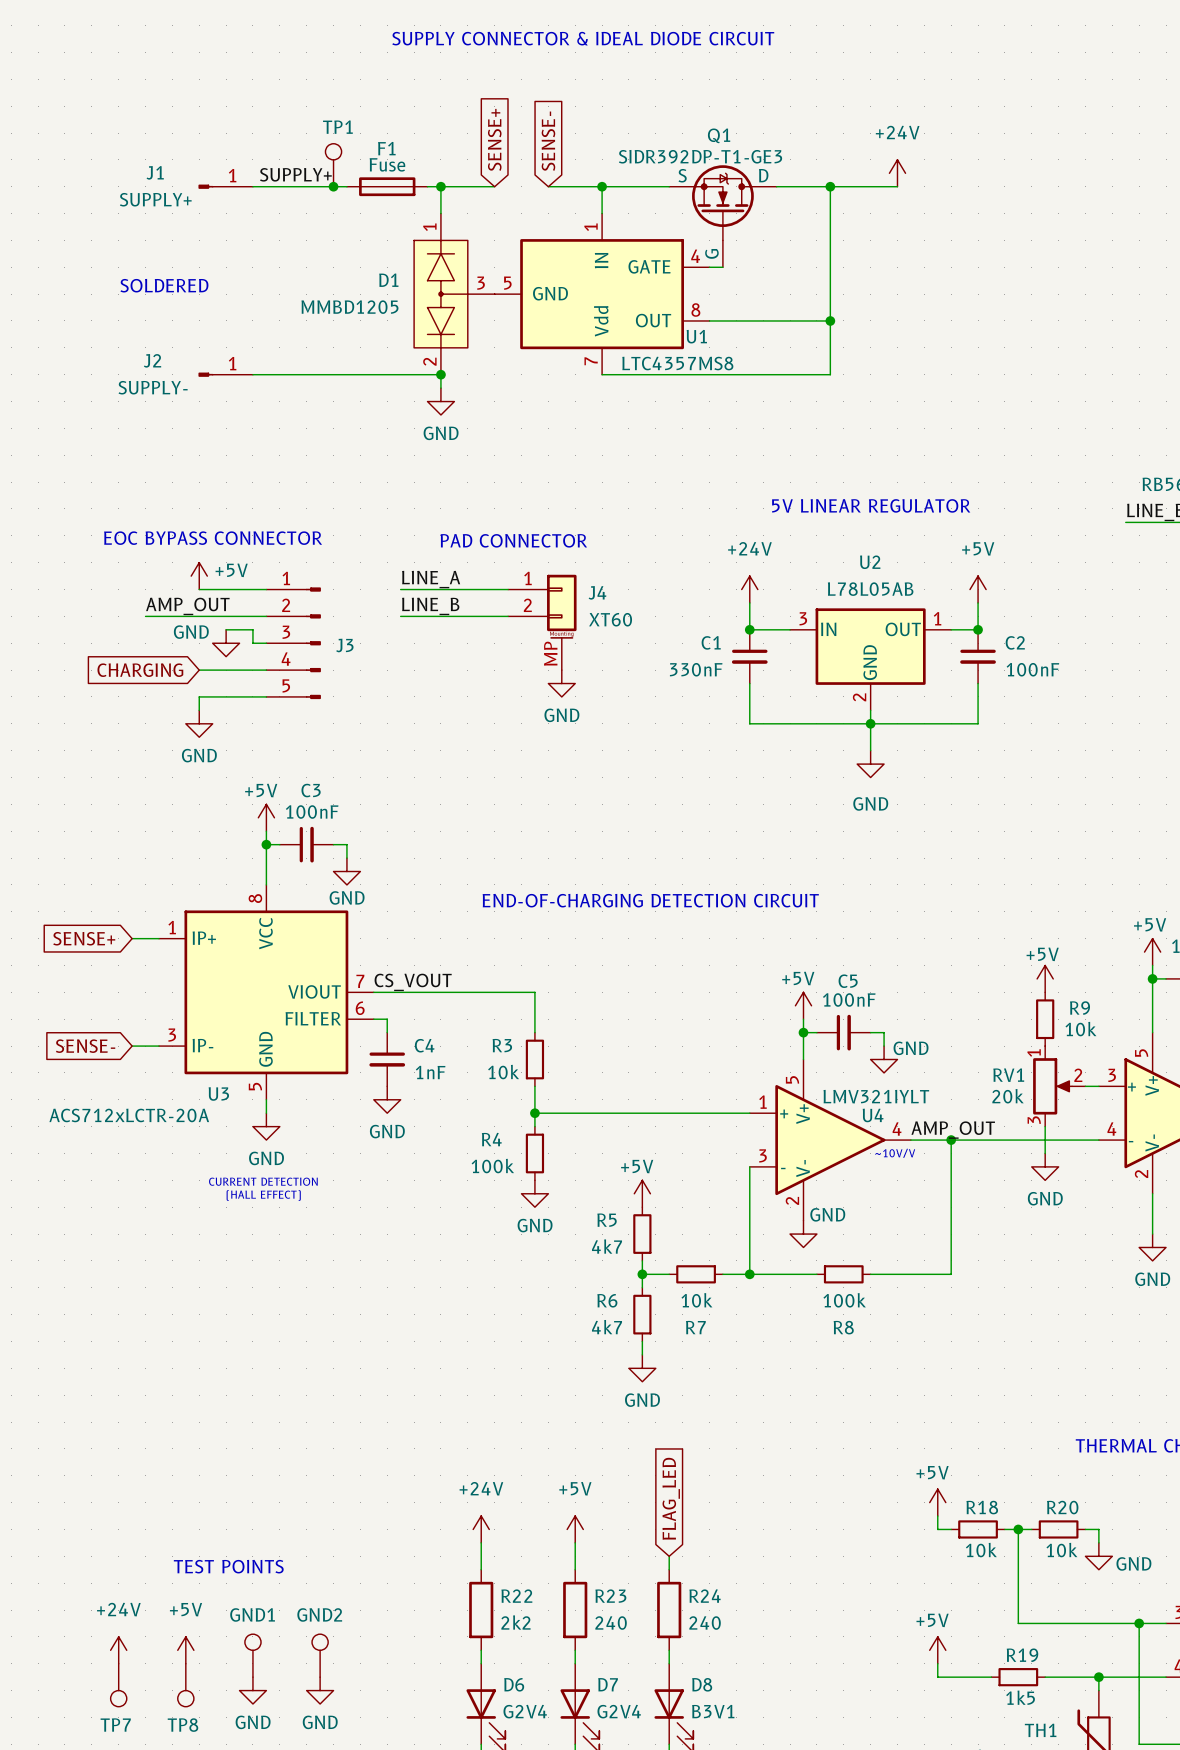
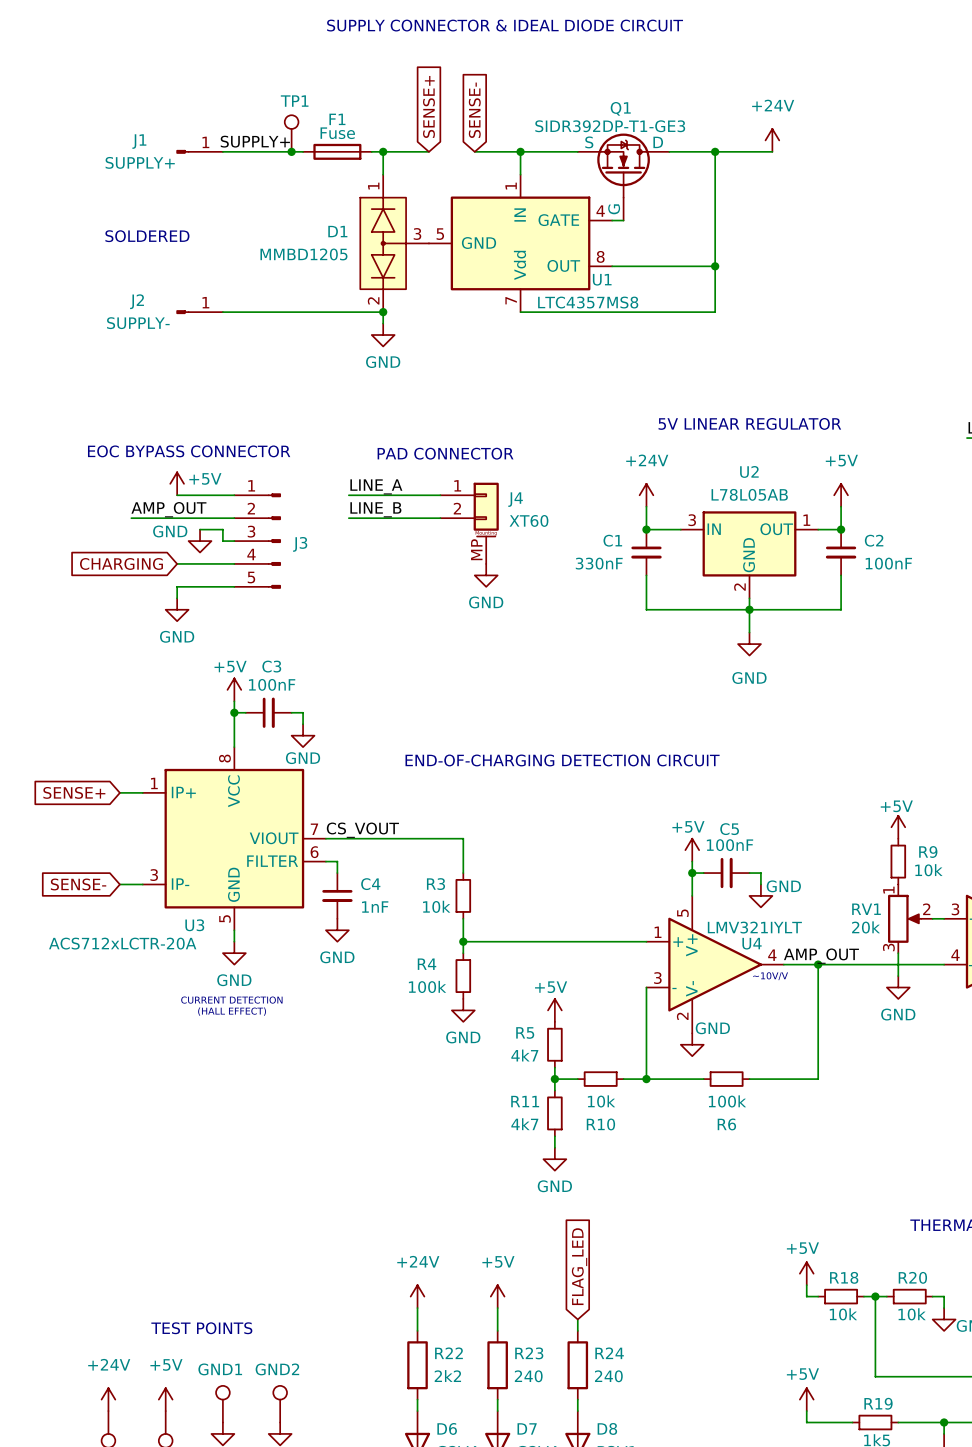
R6 name: R6 (607, 1300) -> R11 (525, 1101)
R7 name: R7 (695, 1327) -> R10 (600, 1124)
R8 name: R8 (843, 1327) -> R6 (726, 1124)

